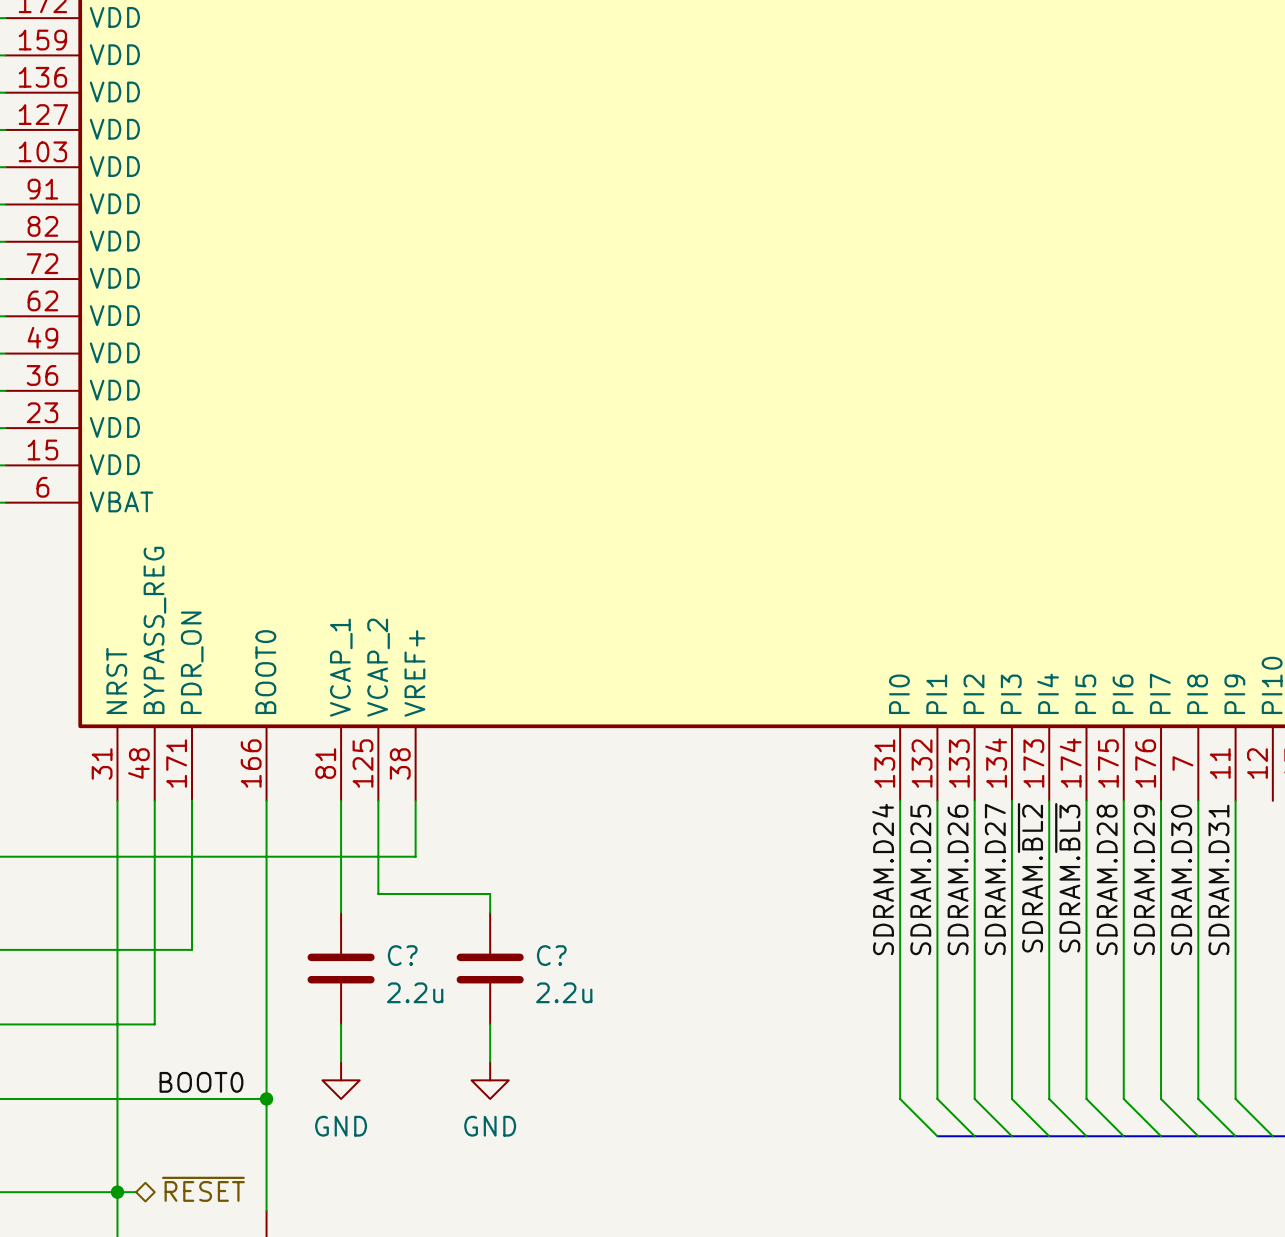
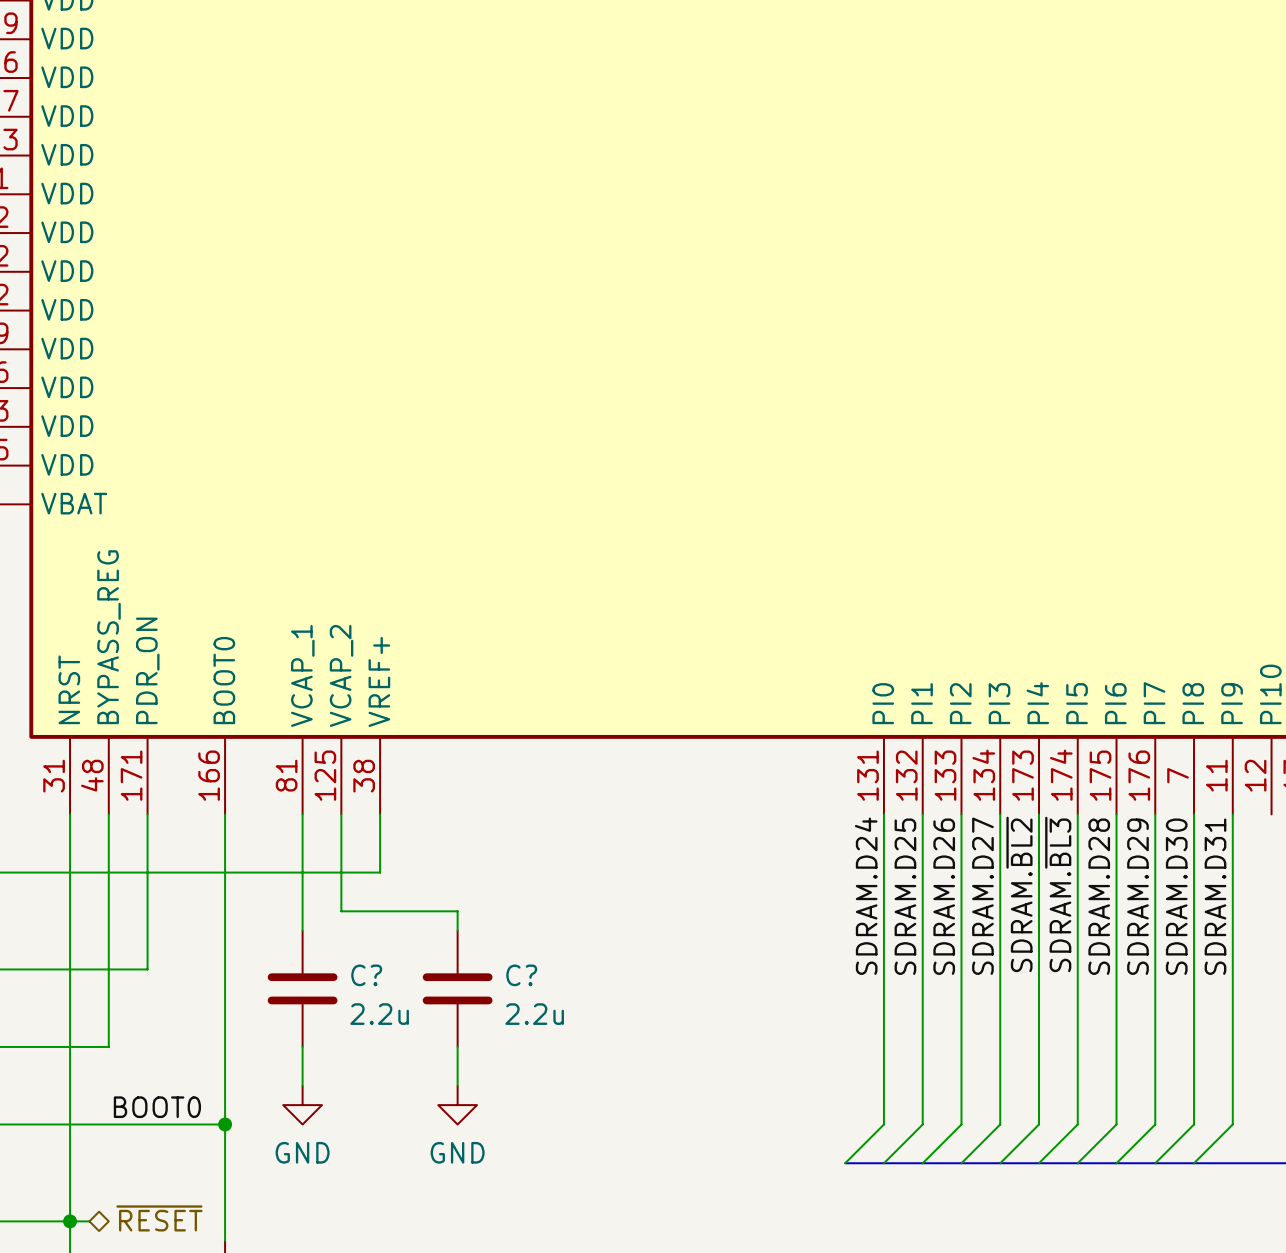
wire: (900, 1098) (937, 1136) -> (883, 1124) (845, 1163)
wire: (937, 1098) (974, 1136) -> (922, 1124) (883, 1163)
wire: (974, 1098) (1011, 1136) -> (961, 1124) (922, 1163)
wire: (1011, 1098) (1049, 1136) -> (1000, 1124) (961, 1163)
wire: (1049, 1098) (1086, 1136) -> (1039, 1124) (1000, 1163)
wire: (1086, 1098) (1123, 1136) -> (1077, 1124) (1039, 1163)
wire: (1123, 1098) (1161, 1136) -> (1116, 1124) (1077, 1163)
wire: (1161, 1098) (1198, 1136) -> (1155, 1124) (1116, 1163)
wire: (1198, 1098) (1235, 1136) -> (1194, 1124) (1155, 1163)
wire: (1235, 1098) (1272, 1136) -> (1232, 1124) (1194, 1163)
bus: none -> (845, 1163) (922, 1163)

